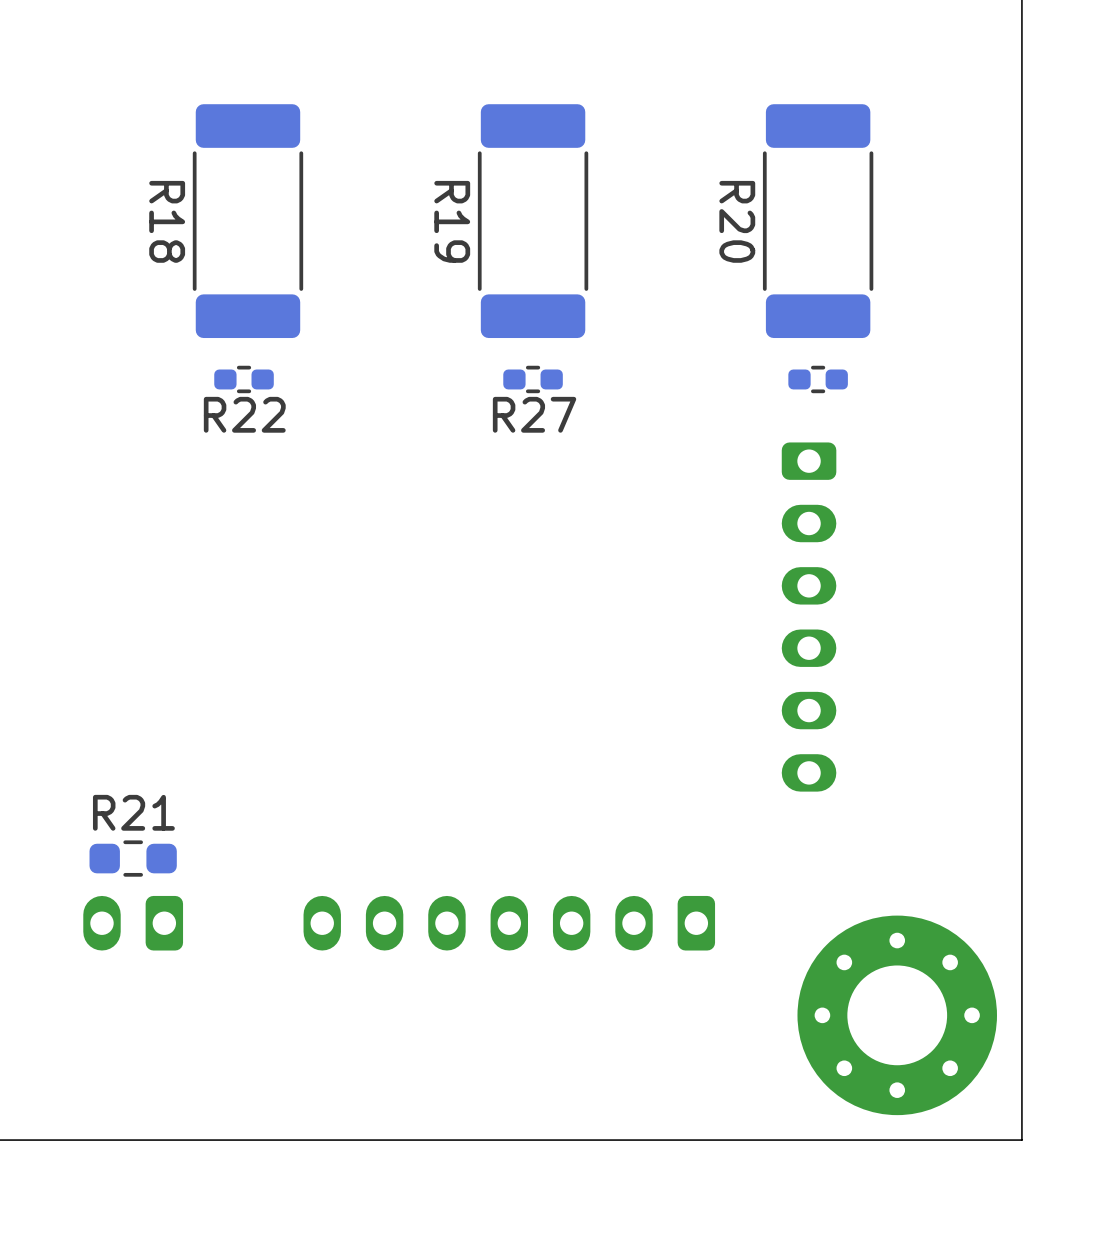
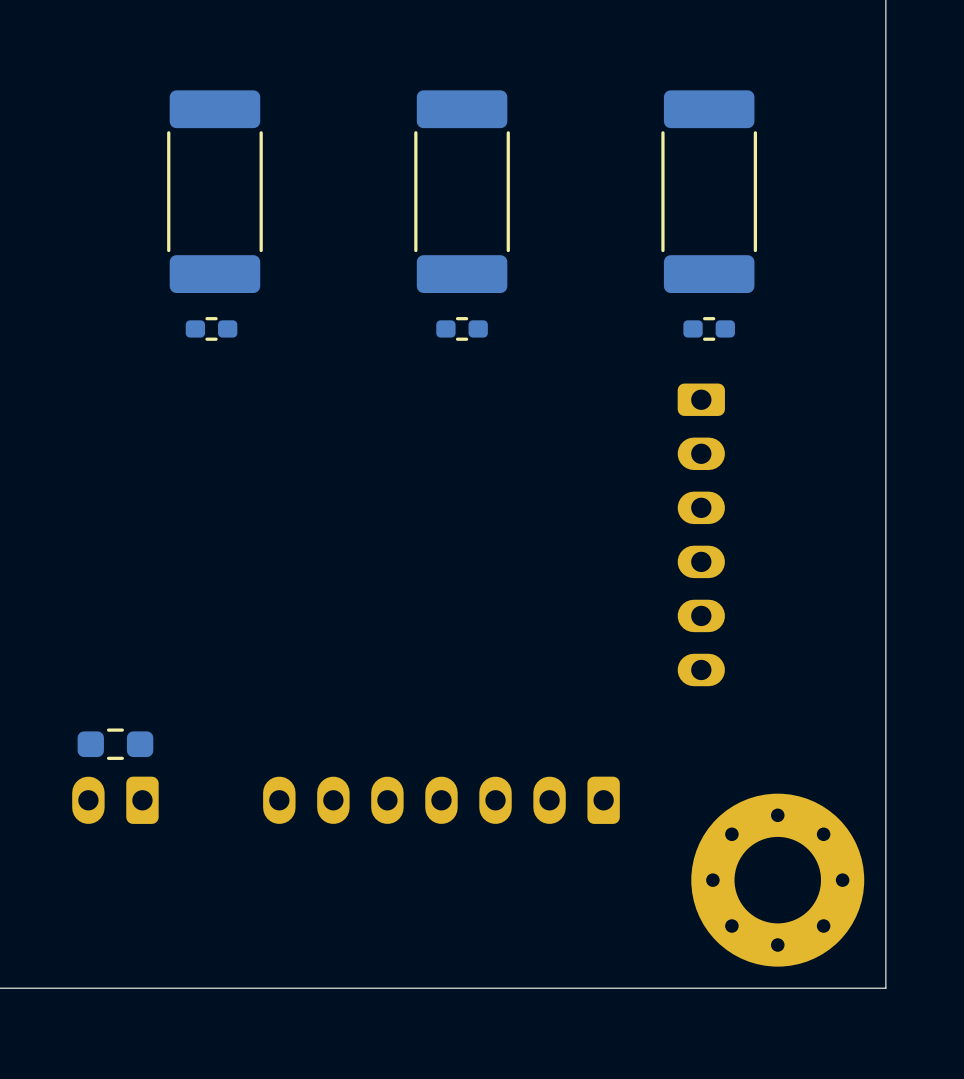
R18 name: R18 (167, 221) -> none
R19 name: R19 (452, 221) -> none
R20 name: R20 (737, 221) -> none
R22 name: R22 (244, 414) -> none
R27 name: R27 (534, 414) -> none
R21 name: R21 (133, 812) -> none

